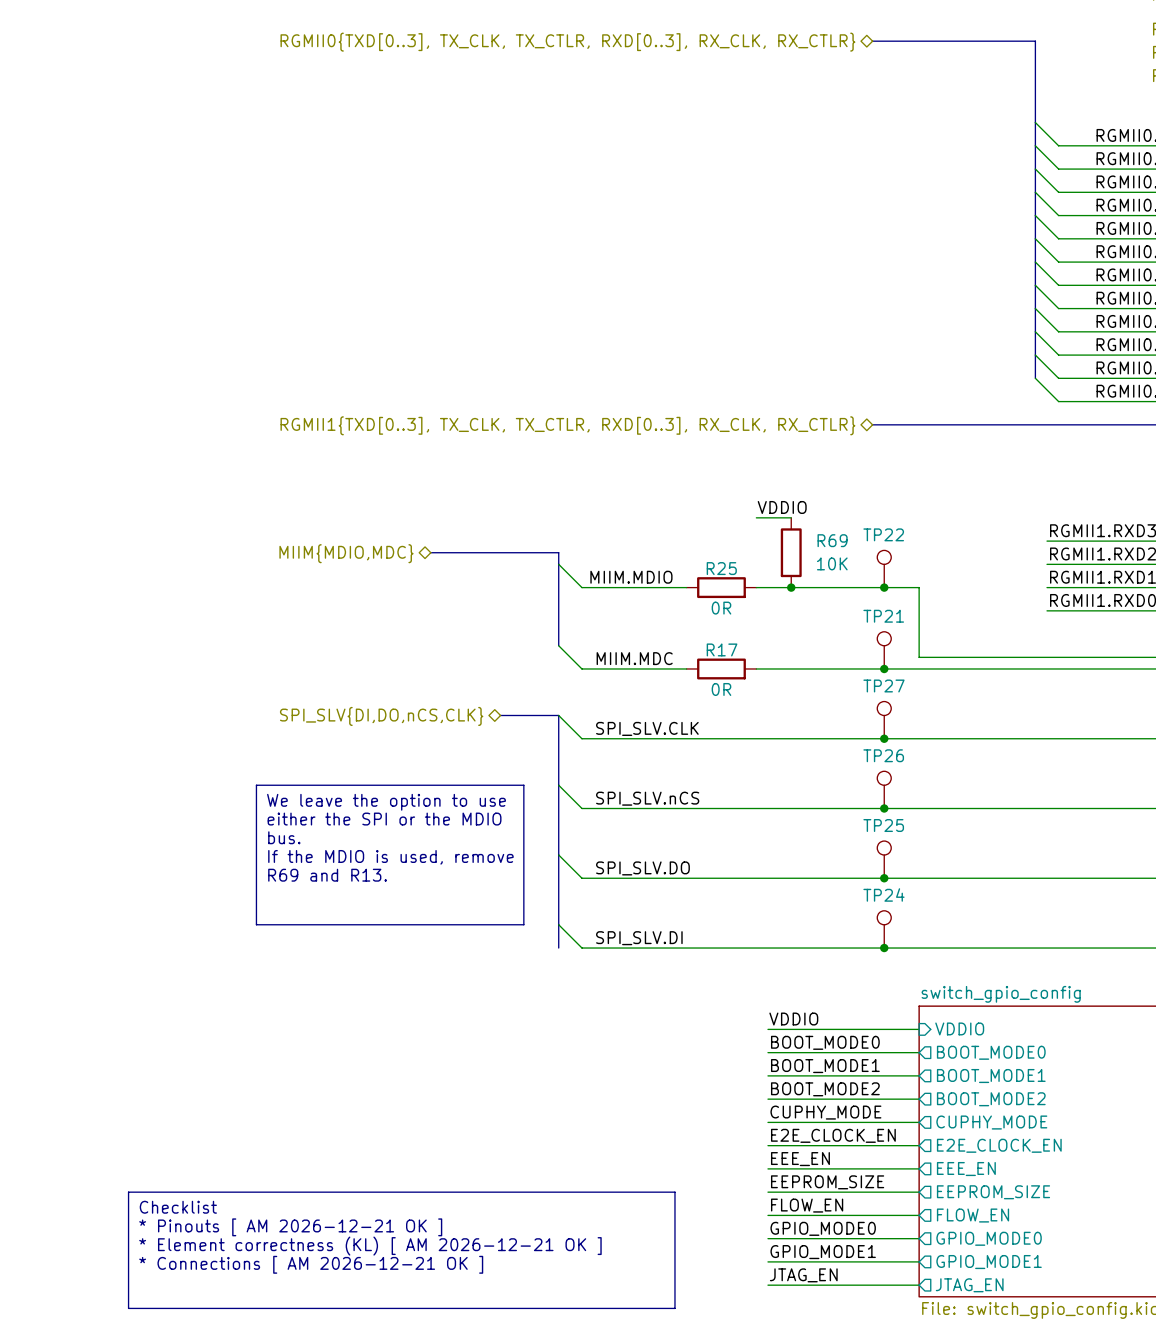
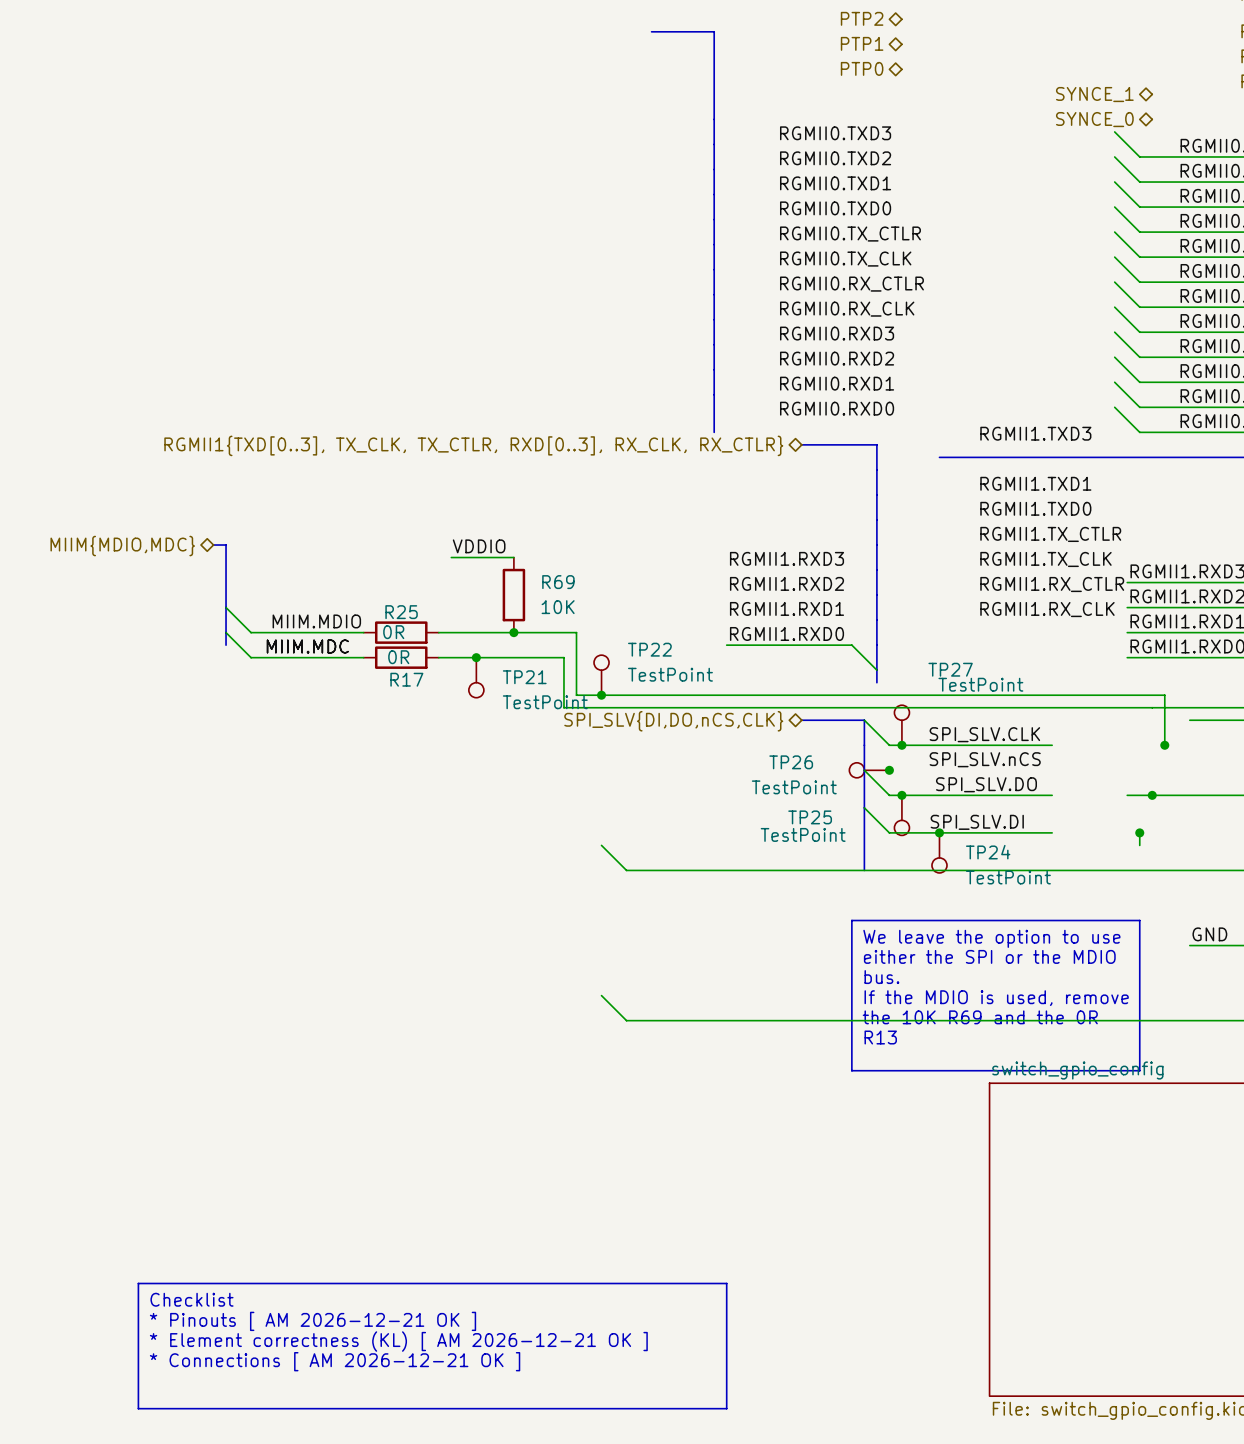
hierarchical label: none -> PTP2 (862, 18)
bus: none -> (651, 31) (714, 31) (714, 432)
hierarchical label: none -> PTP1 (862, 43)
bus: (872, 41) (1035, 41) (1035, 378) -> none
hierarchical label: RGMII0{TXD[0..3], TX_CLK, TX_CTLR, RXD[0..3], RX_CLK, RX_CTLR} (567, 42) -> none
hierarchical label: none -> PTP0 (862, 68)
hierarchical label: none -> SYNCE_1 (1094, 94)
hierarchical label: none -> SYNCE_0 (1094, 119)
label: none -> RGMII0.TXD3 (835, 133)
label: none -> RGMII0.TXD2 (835, 158)
label: none -> RGMII0.TXD1 (835, 183)
label: none -> RGMII0.TXD0 (835, 208)
label: none -> RGMII0.TX_CTLR (850, 234)
label: none -> RGMII0.TX_CLK (845, 259)
label: none -> RGMII0.RX_CTLR (851, 284)
label: none -> RGMII0.RX_CLK (847, 309)
label: none -> RGMII0.RXD3 (837, 333)
label: none -> RGMII0.RXD2 (837, 358)
label: none -> RGMII0.RXD1 (837, 383)
label: none -> RGMII0.RXD0 (837, 408)
label: none -> RGMII1.TXD3 (1035, 433)
bus: none -> (801, 444) (876, 444) (876, 682)
hierarchical label position: RGMII1{TXD[0..3], TX_CLK, TX_CTLR, RXD[0..3], RX_CLK, RX_CTLR} (567, 425) -> RGMII1{TXD[0..3], TX_CLK, TX_CTLR, RXD[0..3], RX_CLK, RX_CTLR} (473, 445)
label: none -> RGMII1.TXD1 (1035, 483)
label: none -> RGMII1.TXD0 (1035, 508)
label: none -> RGMII1.TX_CTLR (1050, 534)
bus: none -> (213, 545) (226, 545) (226, 645)
hierarchical label: none -> MIIM{MDIO,MDC} (122, 546)
label: none -> VDDIO (479, 546)
label: VDDIO (782, 507) -> none
wire: none -> (451, 557) (513, 557)
wire: (756, 517) (791, 517) -> none
label: none -> RGMII1.RXD3 (786, 558)
label: none -> RGMII1.TX_CLK (1045, 559)
TP22 name position: TP22 (883, 534) -> TP22 (649, 649)
label: none -> RGMII1.RXD2 (786, 583)
label: none -> RGMII1.RX_CTLR (1052, 584)
bus: (430, 552) (558, 552) (558, 645) -> none
R69 position: (791, 552) -> (513, 595)
hierarchical label: MIIM{MDIO,MDC} (346, 553) -> none
wire: none -> (226, 607) (251, 632) (363, 632)
wire: (558, 564) (581, 587) (686, 587) -> none
label: none -> RGMII1.RXD1 (786, 608)
label: none -> RGMII1.RX_CLK (1047, 609)
TP22 position: (884, 569) -> (601, 675)
label: none -> MIIM.MDIO (316, 621)
label: MIIM.MDIO (631, 577) -> none
wire: none -> (226, 632) (251, 657) (363, 657)
wire: none -> (438, 632) (576, 632) (576, 695) (1164, 695) (1164, 745)
junction: none -> (513, 632)
R25 position: (721, 587) -> (401, 632)
wire: (756, 587) (919, 587) (919, 657) -> (438, 657) (563, 657) (563, 707) (989, 707)
junction: (791, 587) -> none
junction: (884, 587) -> none
label: none -> RGMII1.RXD0 (786, 633)
wire: none -> (726, 645) (851, 645) (876, 670)
label: none -> MIIM.MDC (307, 646)
R25 value position: 0R (721, 608) -> 0R (393, 632)
junction: none -> (476, 657)
TP21 name position: TP21 (883, 616) -> TP21 (524, 677)
TP22 value: none -> TestPoint (670, 674)
TP27 value: none -> TestPoint (980, 684)
TP21 rotation: 0° (884, 638) -> 180° (476, 690)
wire: (558, 645) (581, 668) (686, 668) -> none
junction: none -> (601, 695)
R17 name position: R17 (722, 649) -> R17 (406, 679)
TP21 position: (884, 650) -> (476, 677)
TP21 value: none -> TestPoint (545, 702)
label: MIIM.MDC (634, 658) -> none
R17 position: (721, 668) -> (401, 657)
bus: none -> (801, 720) (864, 720) (864, 870)
wire: (756, 668) (1105, 668) -> none
wire: none -> (864, 720) (889, 745) (1052, 745)
junction: (884, 668) -> none
hierarchical label: none -> SPI_SLV{DI,DO,nCS,CLK} (673, 721)
label: none -> SPI_SLV.CLK (984, 734)
TP27 name position: TP27 (883, 685) -> TP27 (950, 669)
R17 value position: 0R (721, 689) -> 0R (398, 657)
junction: none -> (901, 745)
junction: none -> (1164, 745)
label: none -> SPI_SLV.nCS (985, 759)
bus: (500, 715) (558, 715) (558, 948) -> none
wire: (558, 715) (581, 738) (826, 738) -> (864, 770) (889, 795)
junction: none -> (889, 770)
hierarchical label: SPI_SLV{DI,DO,nCS,CLK} (381, 716) -> none
TP27 position: (884, 720) -> (901, 725)
label: SPI_SLV.CLK (647, 728) -> none
label: none -> SPI_SLV.DO (986, 784)
TP26 value: none -> TestPoint (794, 787)
junction: none -> (901, 795)
junction: (884, 738) -> none
wire: (977, 738) (1047, 738) -> none
junction: none -> (1152, 795)
wire: none -> (864, 807) (889, 832) (1052, 832)
TP26 name position: TP26 (883, 755) -> TP26 (791, 762)
label: none -> SPI_SLV.DI (977, 822)
junction: none -> (939, 832)
wire: none -> (1139, 832) (1139, 845)
junction: none -> (1139, 832)
TP25 value: none -> TestPoint (803, 834)
TP26 rotation: 0° (884, 778) -> 90° counterclockwise (856, 770)
line: (256, 785) (523, 785) (523, 924) (256, 924) (256, 785) -> none
TP26 position: (884, 789) -> (869, 770)
label: SPI_SLV.nCS (647, 798) -> none
text: We leave the option to use (386, 802) -> none
junction: (884, 808) -> none
TP24 value: none -> TestPoint (1008, 877)
text: either the SPI or the MDIO (384, 819) -> none
TP25 name position: TP25 (883, 825) -> TP25 (810, 817)
text: bus. (284, 837) -> none
TP25 rotation: 0° (884, 848) -> 180° (901, 827)
wire: (558, 855) (581, 878) (1105, 878) -> none
line: none -> (851, 920) (1139, 920) (1139, 1070) (851, 1070) (851, 920)
text: If the MDIO is used, remove (390, 857) -> none
TP25 position: (884, 859) -> (901, 815)
label: none -> GND (1209, 934)
label: SPI_SLV.DO (642, 868) -> none
text: none -> We leave the option to use (991, 938)
text: R69 and R13. (327, 875) -> none
junction: (884, 878) -> none
text: none -> either the SPI or the MDIO (989, 956)
TP24 name position: TP24 (883, 894) -> TP24 (988, 852)
text: none -> bus. (881, 977)
TP24 rotation: 0° (884, 917) -> 180° (939, 865)
text: none -> If the MDIO is used, remove (996, 998)
TP24 position: (884, 929) -> (939, 852)
label: SPI_SLV.DI (639, 938) -> none
text: none -> the 10K R69 and the 0R (980, 1017)
junction: (884, 948) -> none
text: none -> R13 (880, 1037)
label: VDDIO (793, 1019) -> none
sheet pin: VDDIO (959, 1028) -> none
wire: (767, 1029) (919, 1029) -> none
label: BOOT_MODE0 (825, 1042) -> none
wire: (767, 1052) (919, 1052) -> none
sheet pin: BOOT_MODE0 (991, 1052) -> none
label: BOOT_MODE1 (825, 1066) -> none
wire: (767, 1075) (919, 1075) -> none
sheet pin: BOOT_MODE1 (991, 1076) -> none
label: BOOT_MODE2 (825, 1089) -> none
wire: (767, 1099) (919, 1099) -> none
sheet pin: BOOT_MODE2 (991, 1099) -> none
label: CUPHY_MODE (825, 1112) -> none
wire: (767, 1122) (919, 1122) -> none
sheet pin: CUPHY_MODE (991, 1122) -> none
label: E2E_CLOCK_EN (833, 1135) -> none
wire: (767, 1145) (919, 1145) -> none
sheet pin: E2E_CLOCK_EN (999, 1145) -> none
label: EEE_EN (800, 1159) -> none
wire: (767, 1168) (919, 1168) -> none
sheet pin: EEE_EN (966, 1169) -> none
label: EEPROM_SIZE (827, 1182) -> none
wire: (767, 1192) (919, 1192) -> none
sheet pin: EEPROM_SIZE (993, 1192) -> none
label: FLOW_EN (807, 1205) -> none
wire: (767, 1215) (919, 1215) -> none
sheet pin: FLOW_EN (973, 1215) -> none
label: GPIO_MODE0 (823, 1228) -> none
wire: (767, 1238) (919, 1238) -> none
sheet pin: GPIO_MODE0 (989, 1238) -> none
label: GPIO_MODE1 (823, 1252) -> none
wire: (767, 1261) (919, 1261) -> none
sheet pin: GPIO_MODE1 (989, 1262) -> none
label: JTAG_EN (803, 1275) -> none
wire: (767, 1285) (919, 1285) -> none
sheet pin: JTAG_EN (969, 1285) -> none

